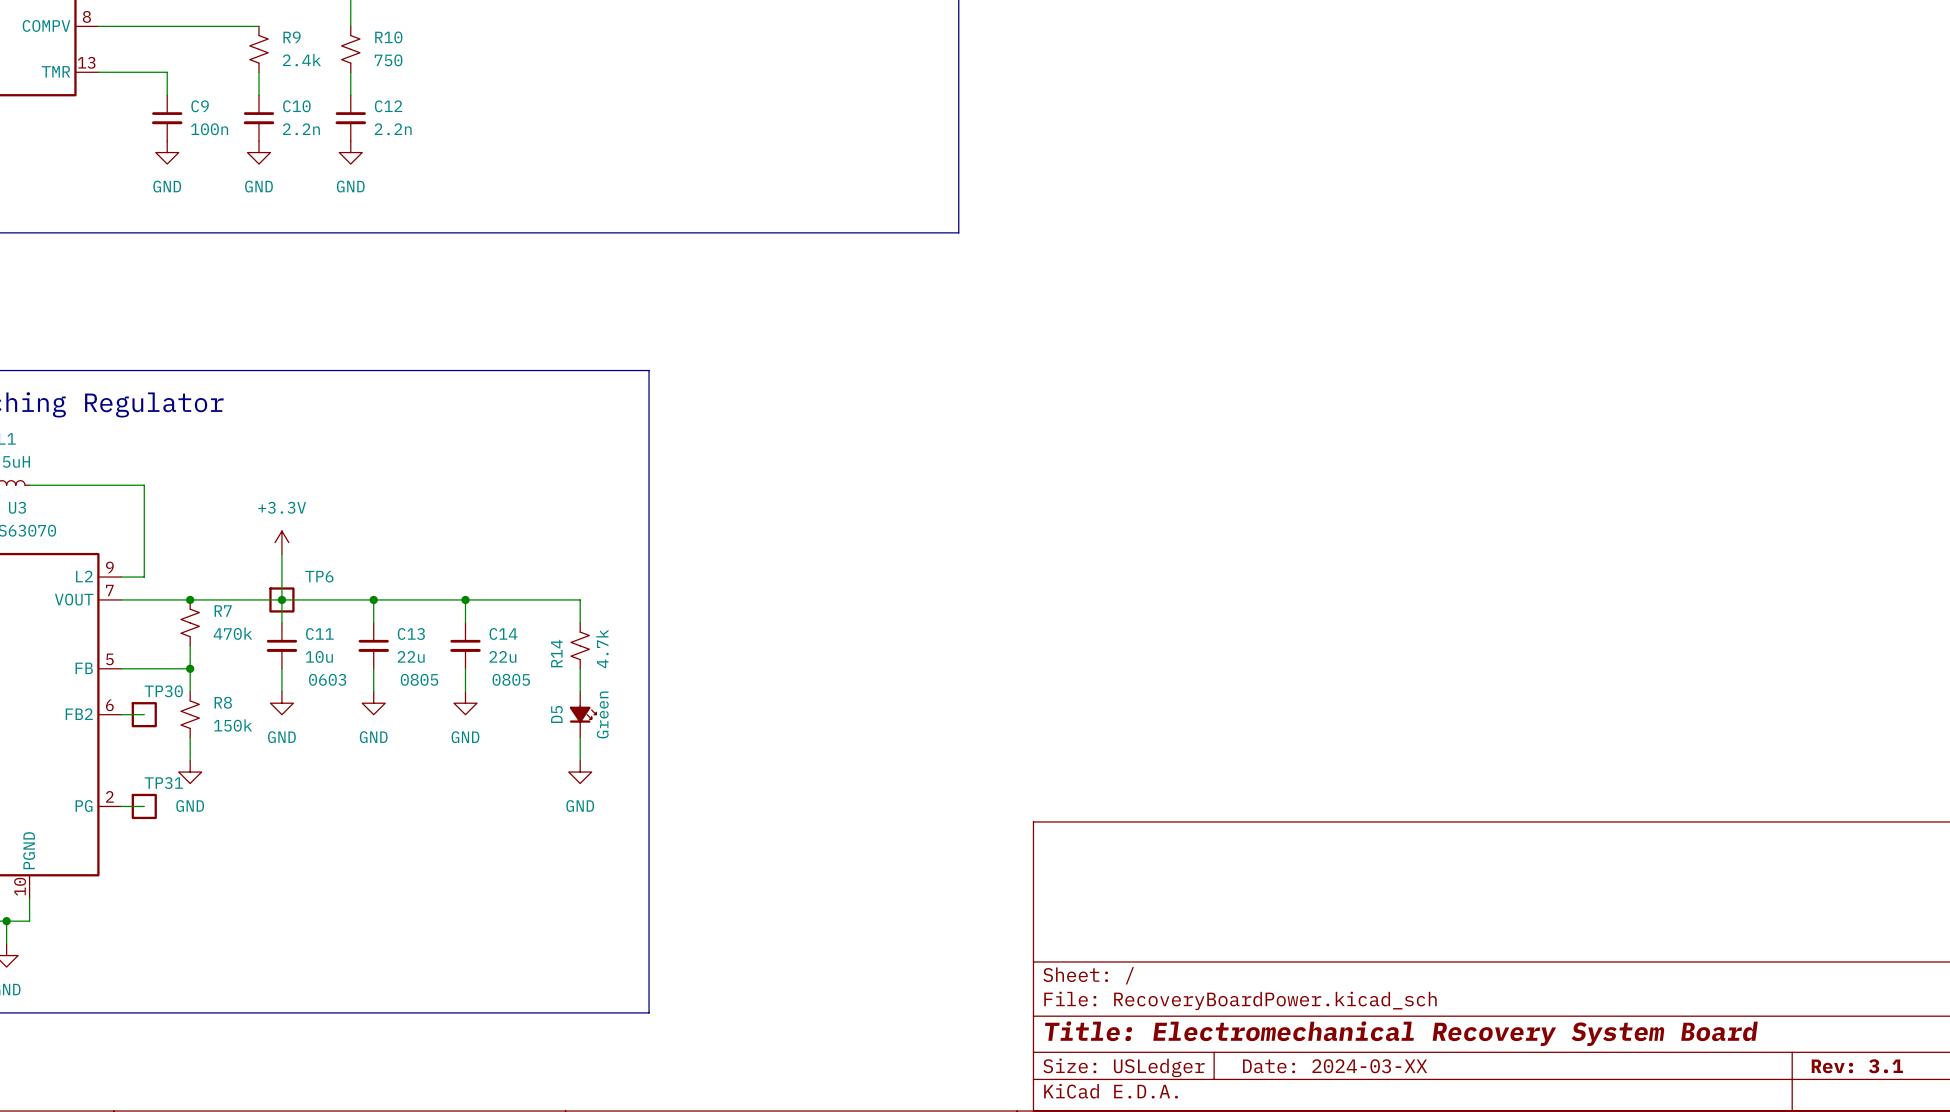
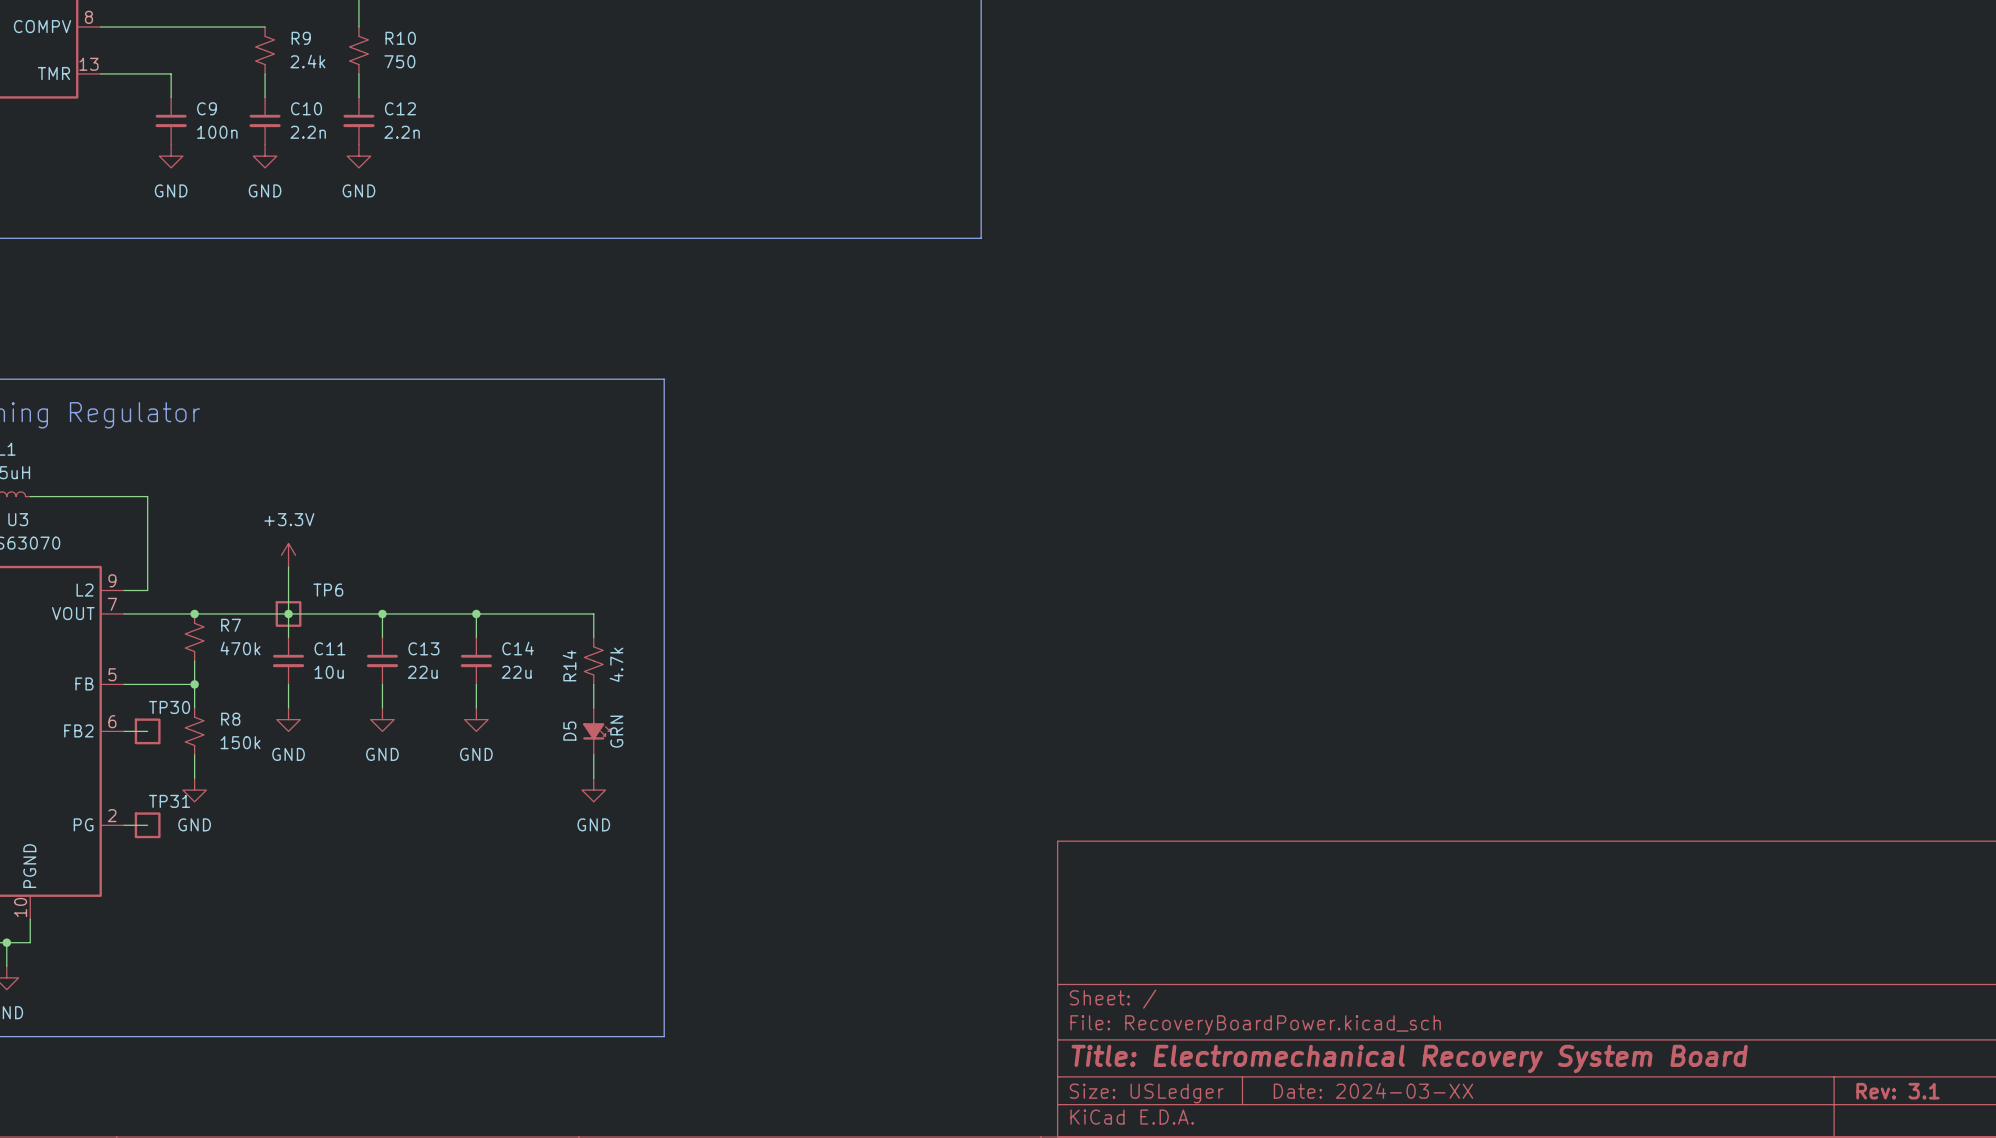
C11 text: 0603 (327, 679) -> none
C13 text: 0805 (419, 679) -> none
C14 text: 0805 (511, 679) -> none
D5 value: Green (602, 714) -> GRN (616, 731)

